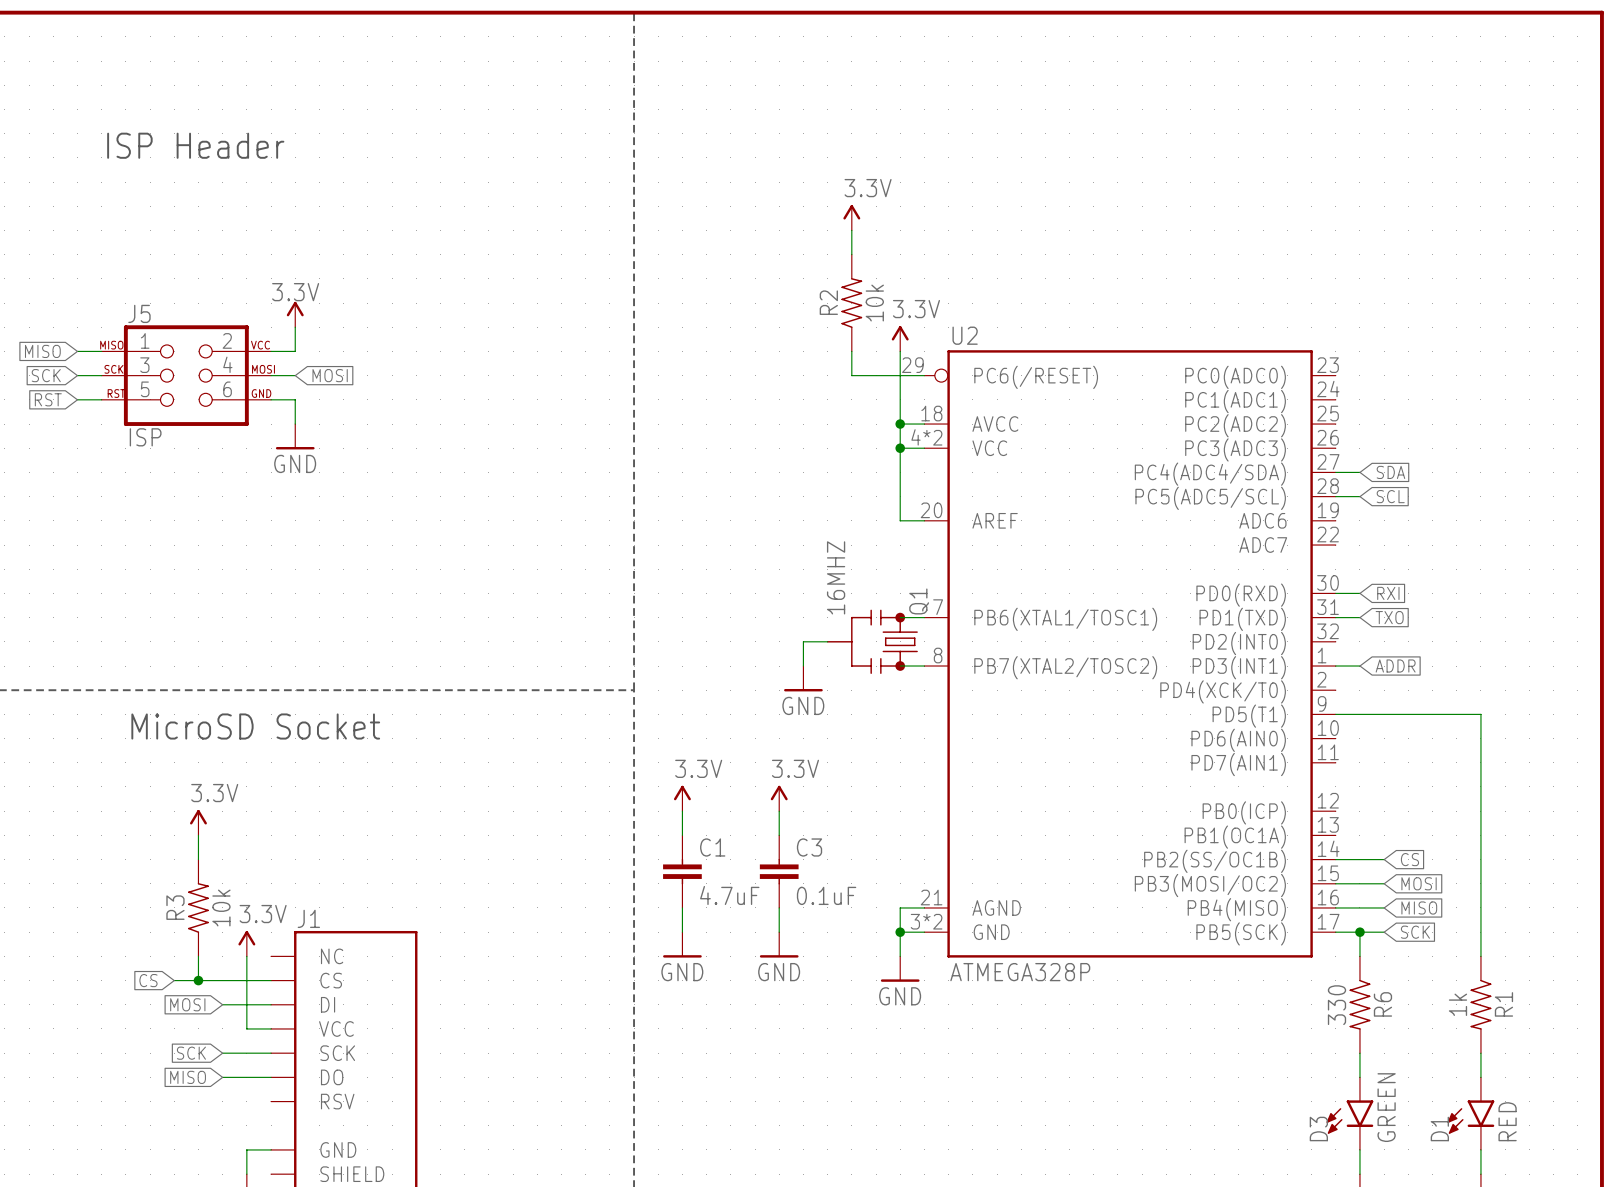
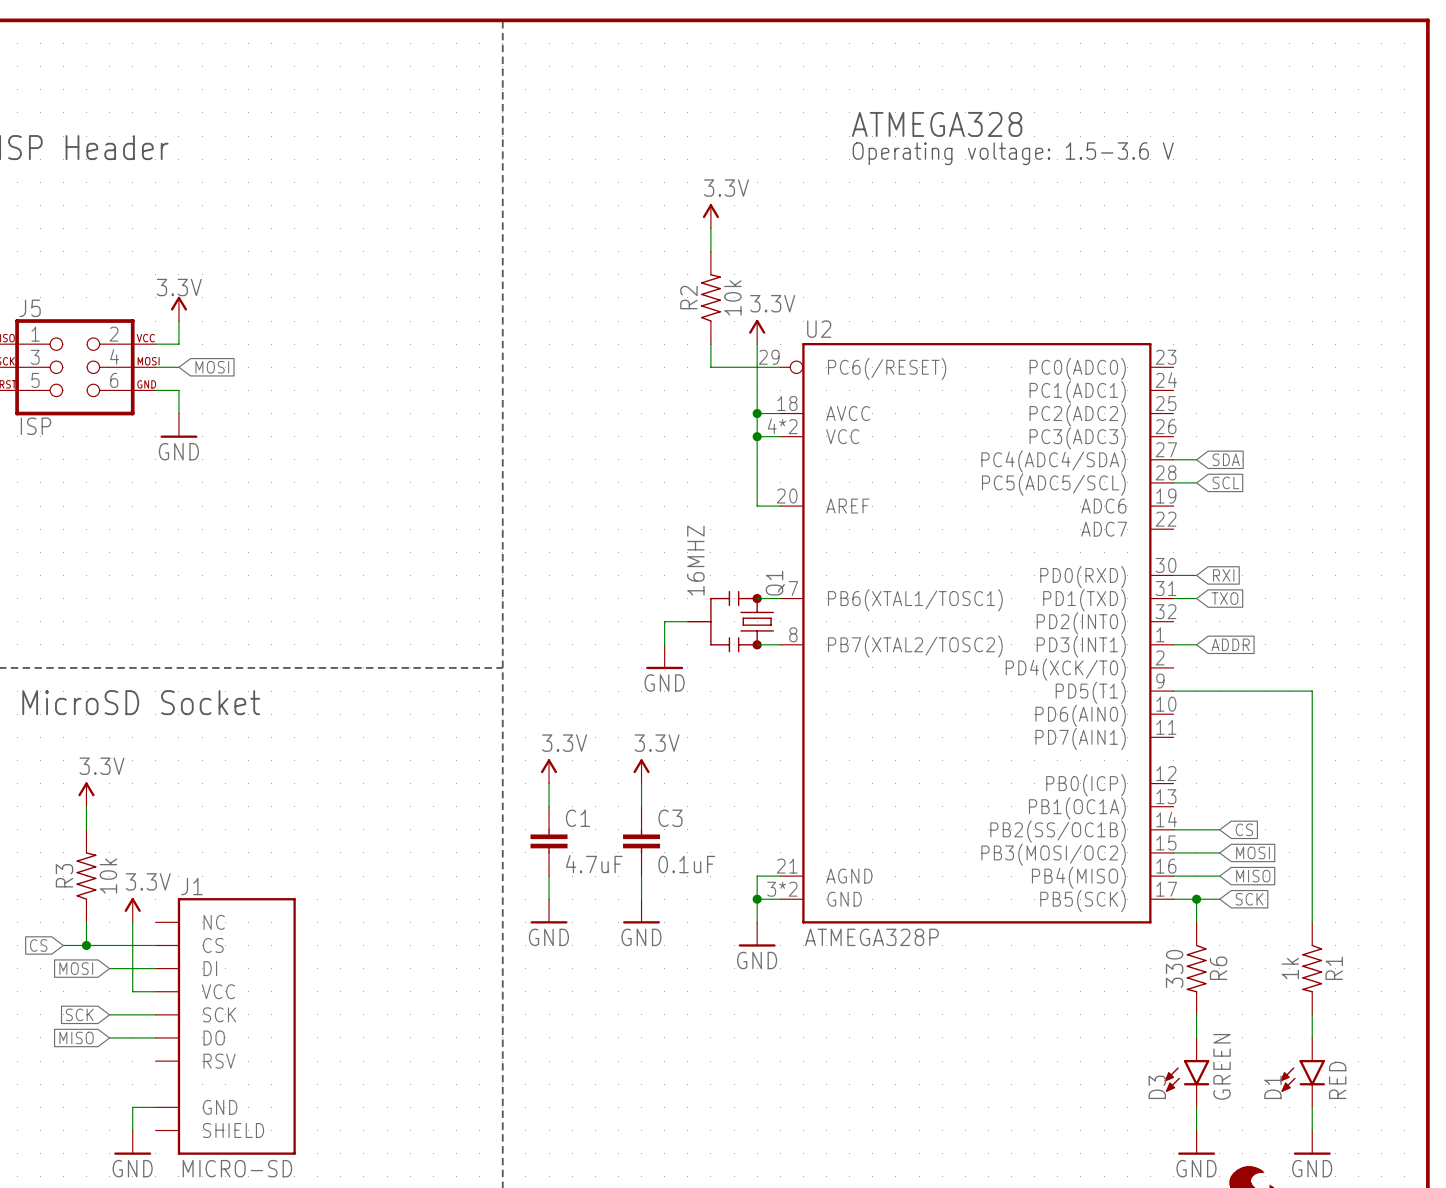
text: none -> ATMEGA328 (937, 124)
text: none -> Operating voltage: 1.5-3.6 V (1013, 153)

